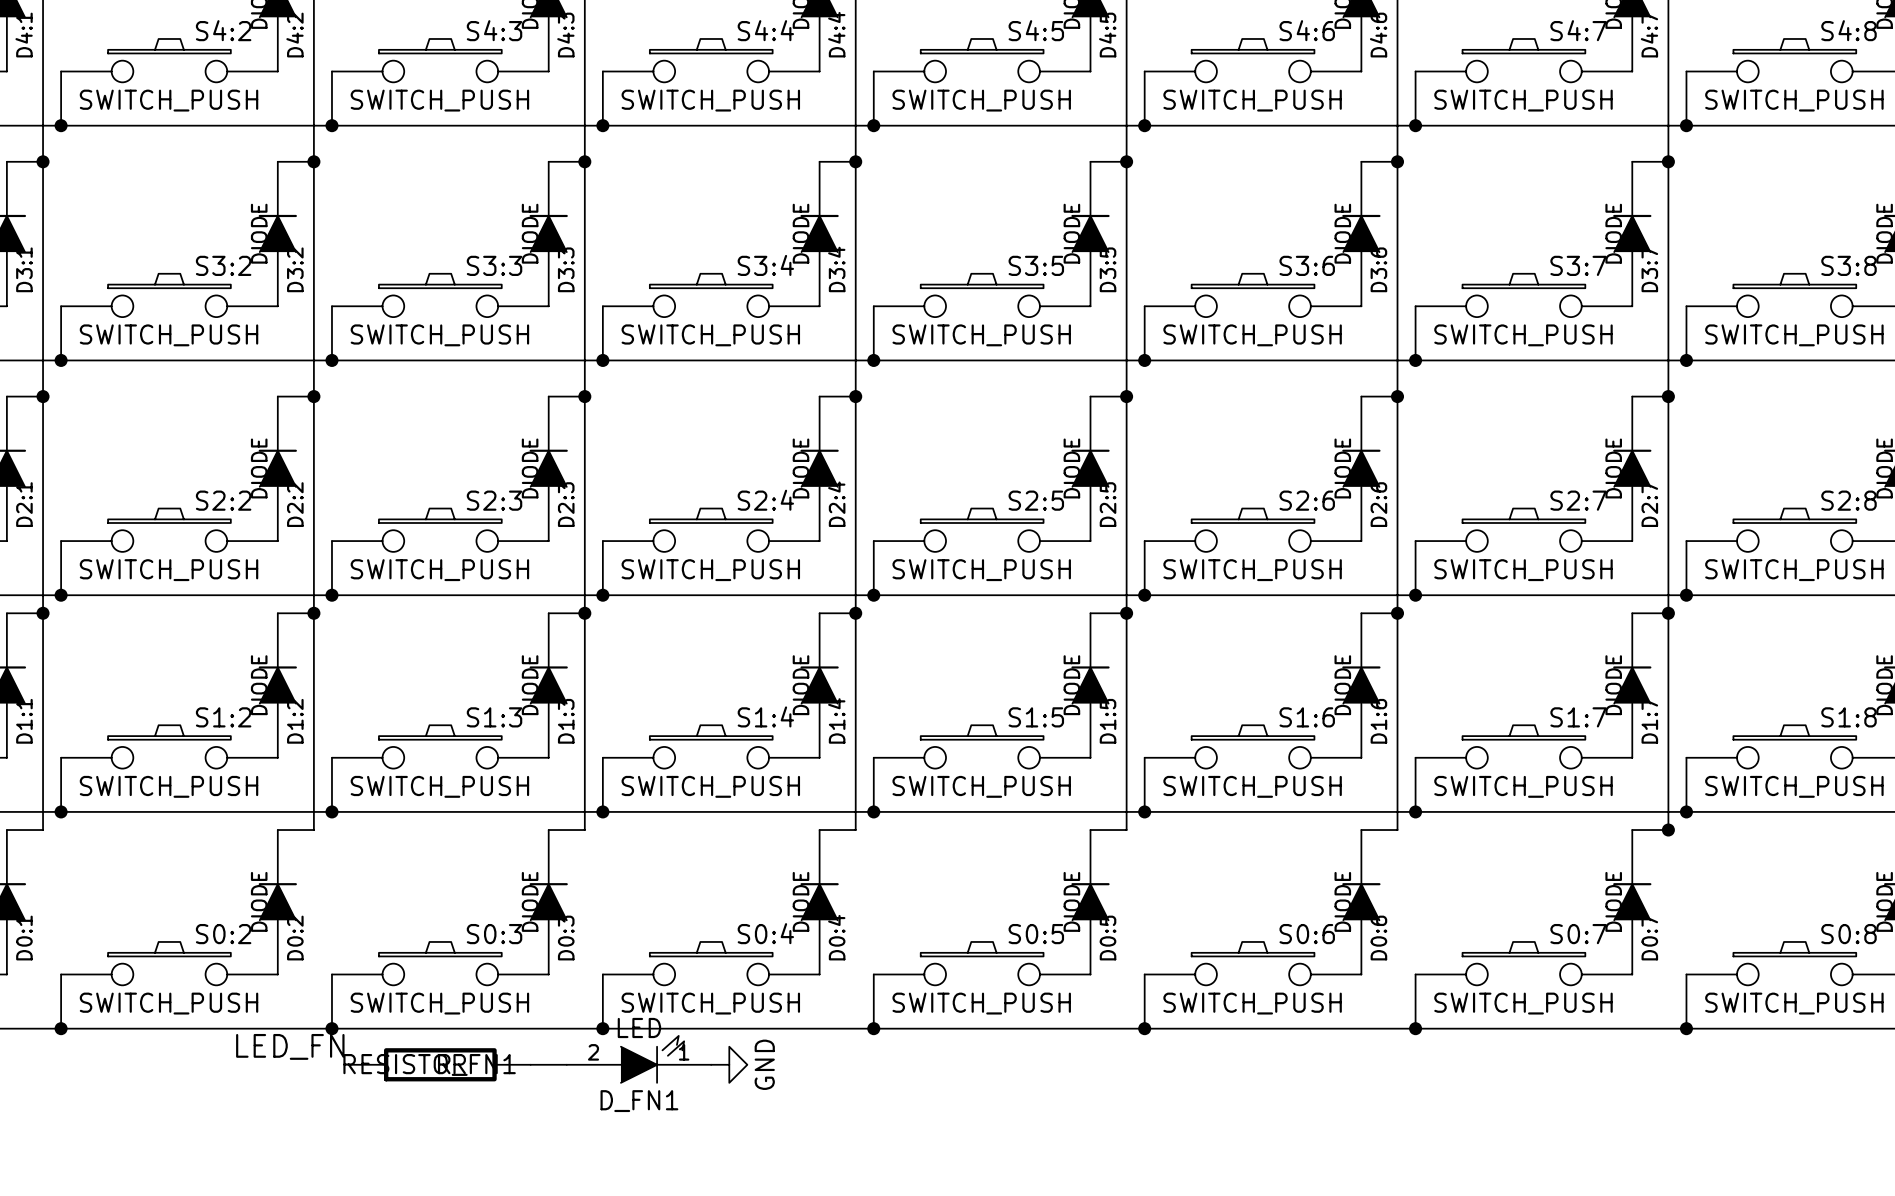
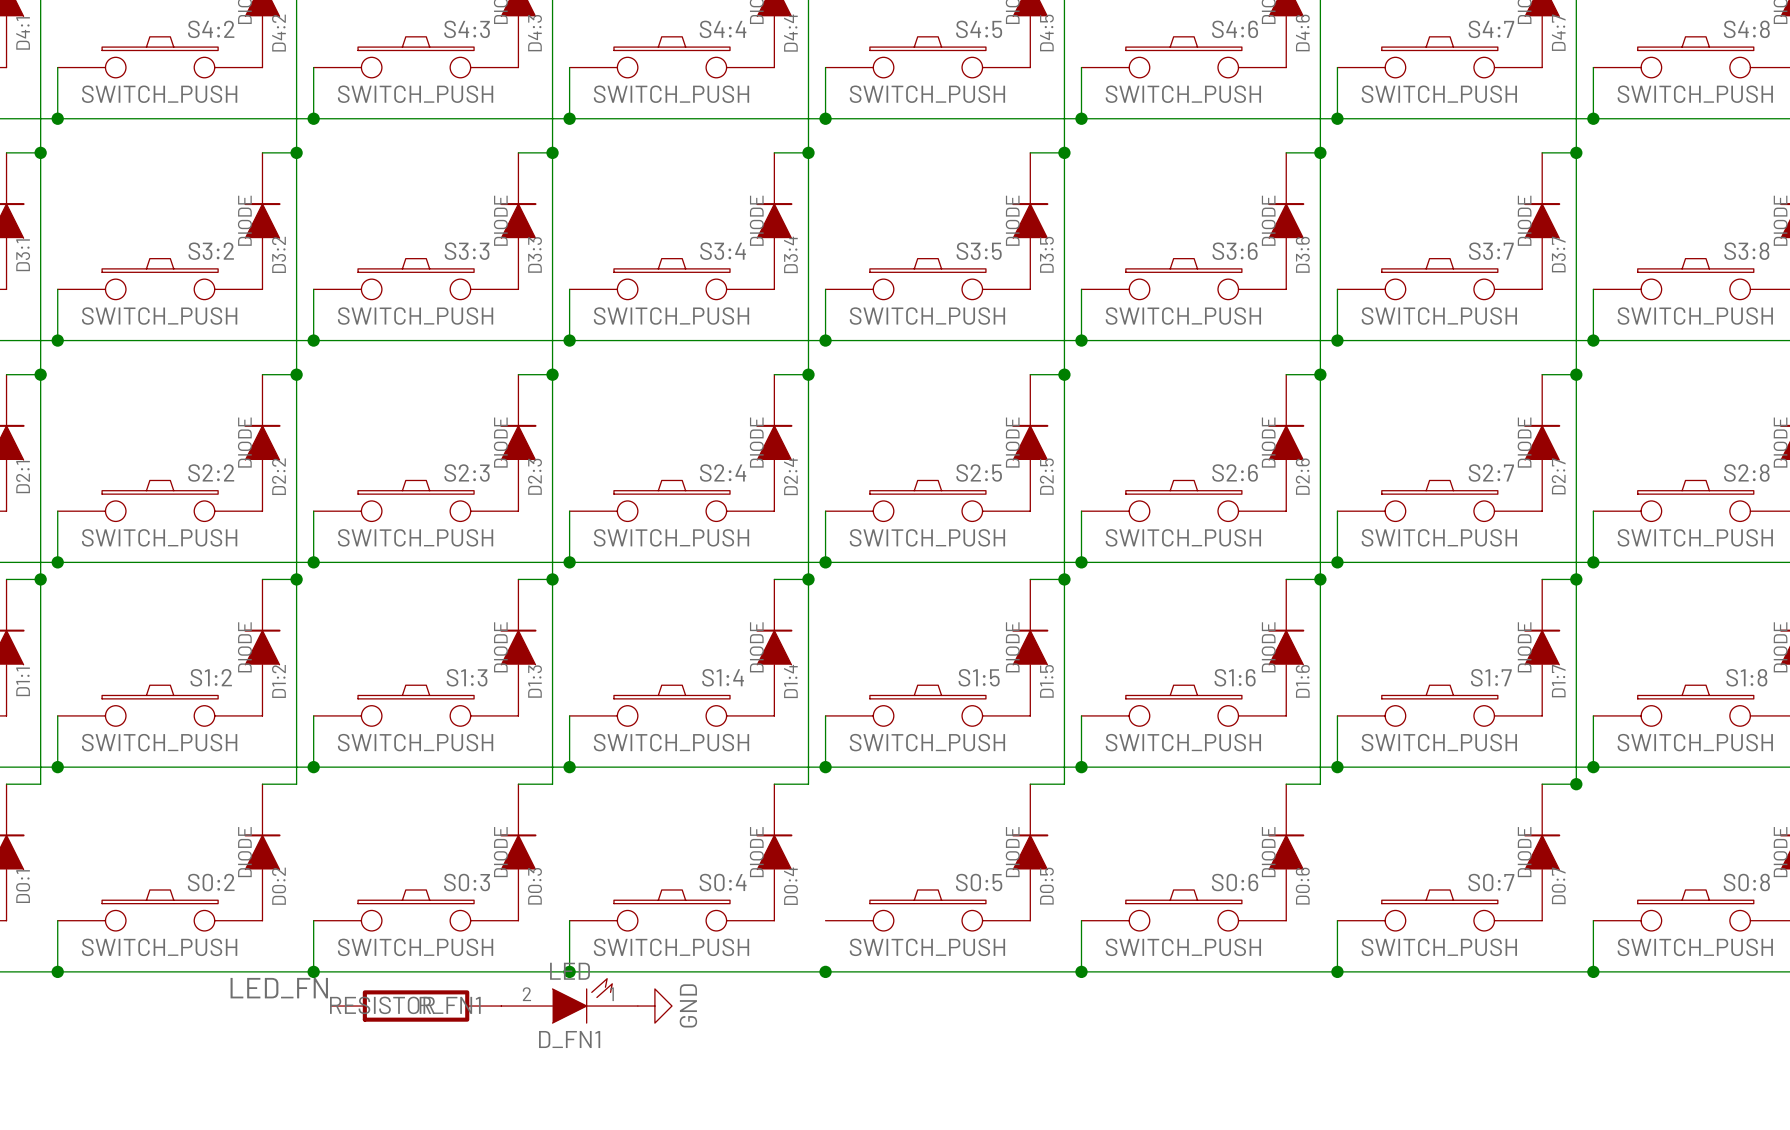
wire: (873, 974) (873, 1028) -> none
D_FN1 position: (639, 1059) -> (569, 1000)
power symbol position: GND (729, 1064) -> GND (654, 1006)

